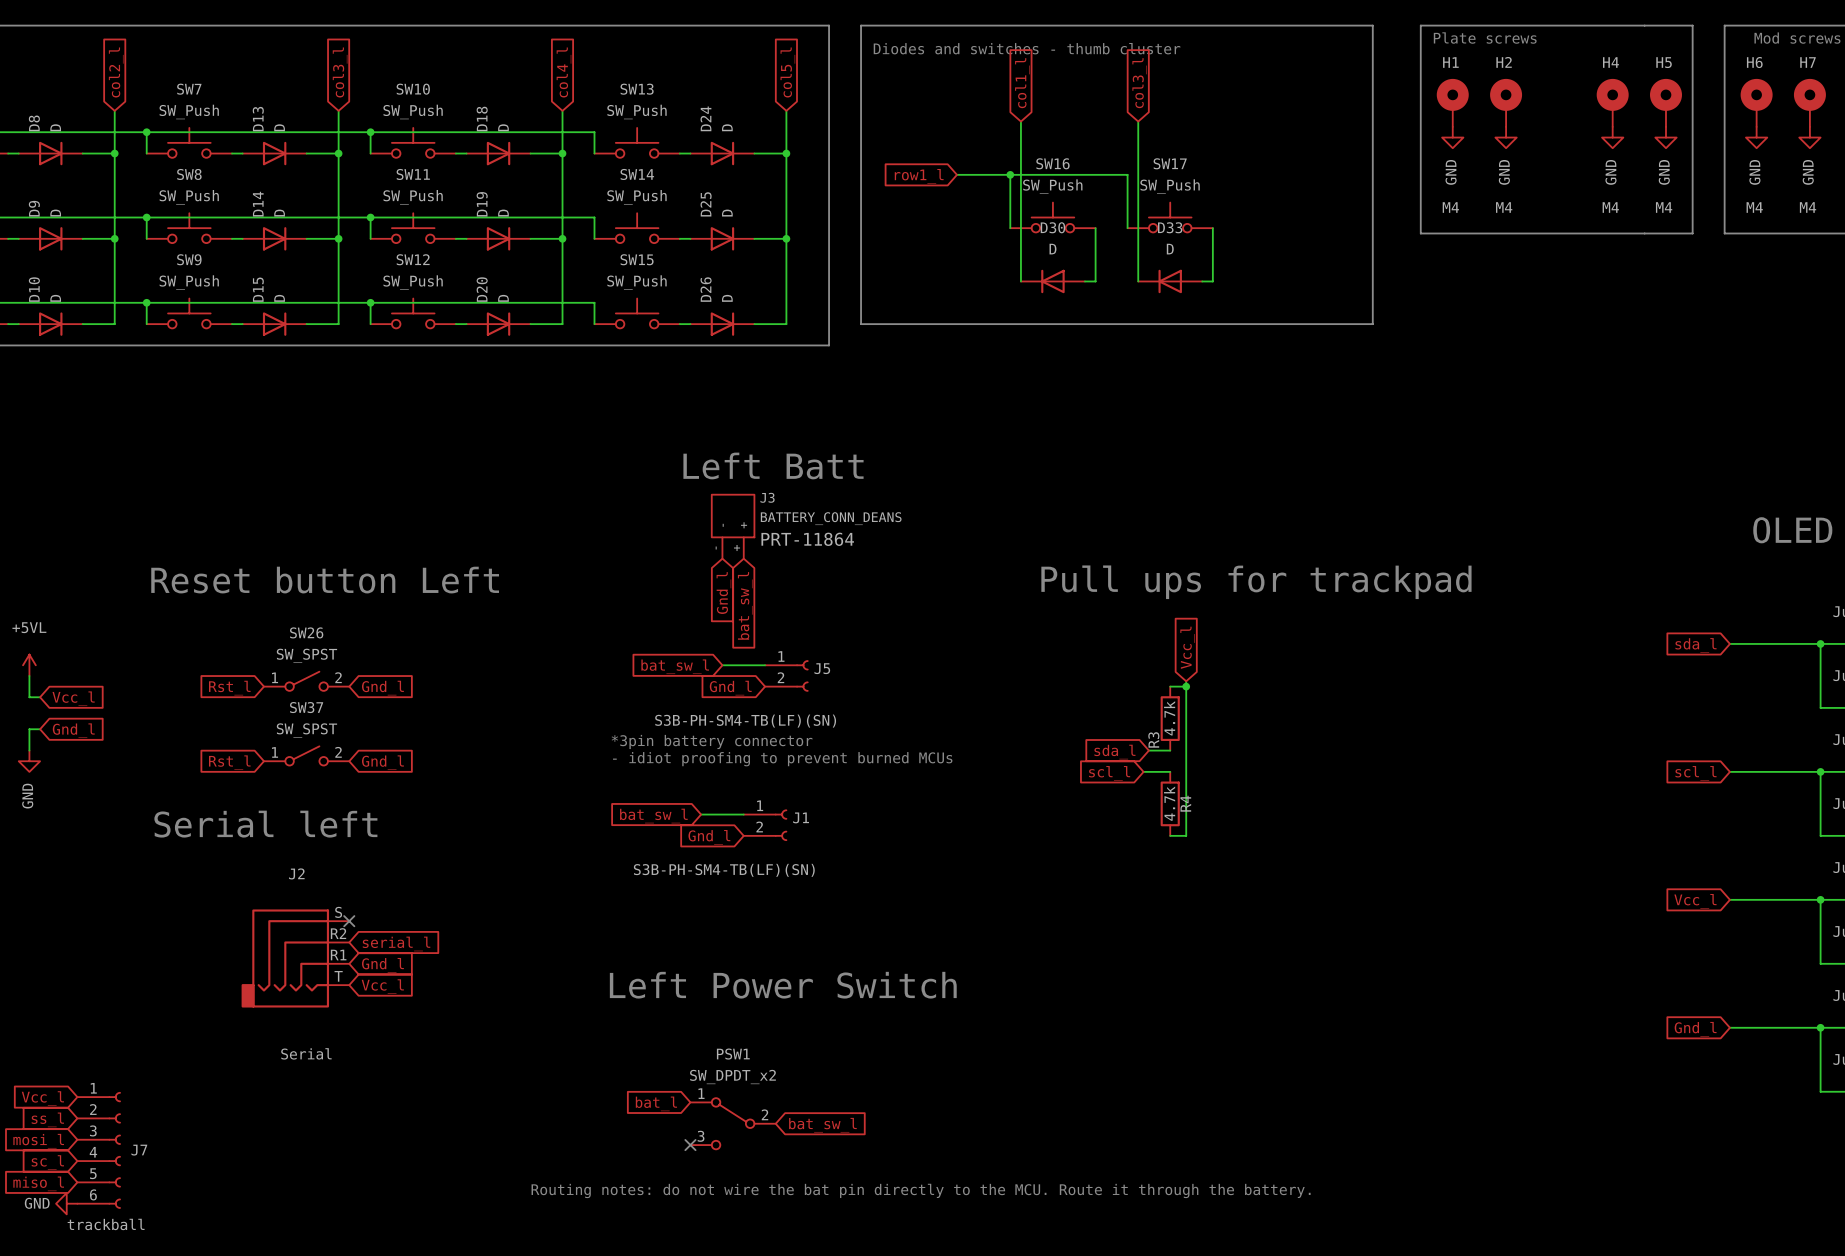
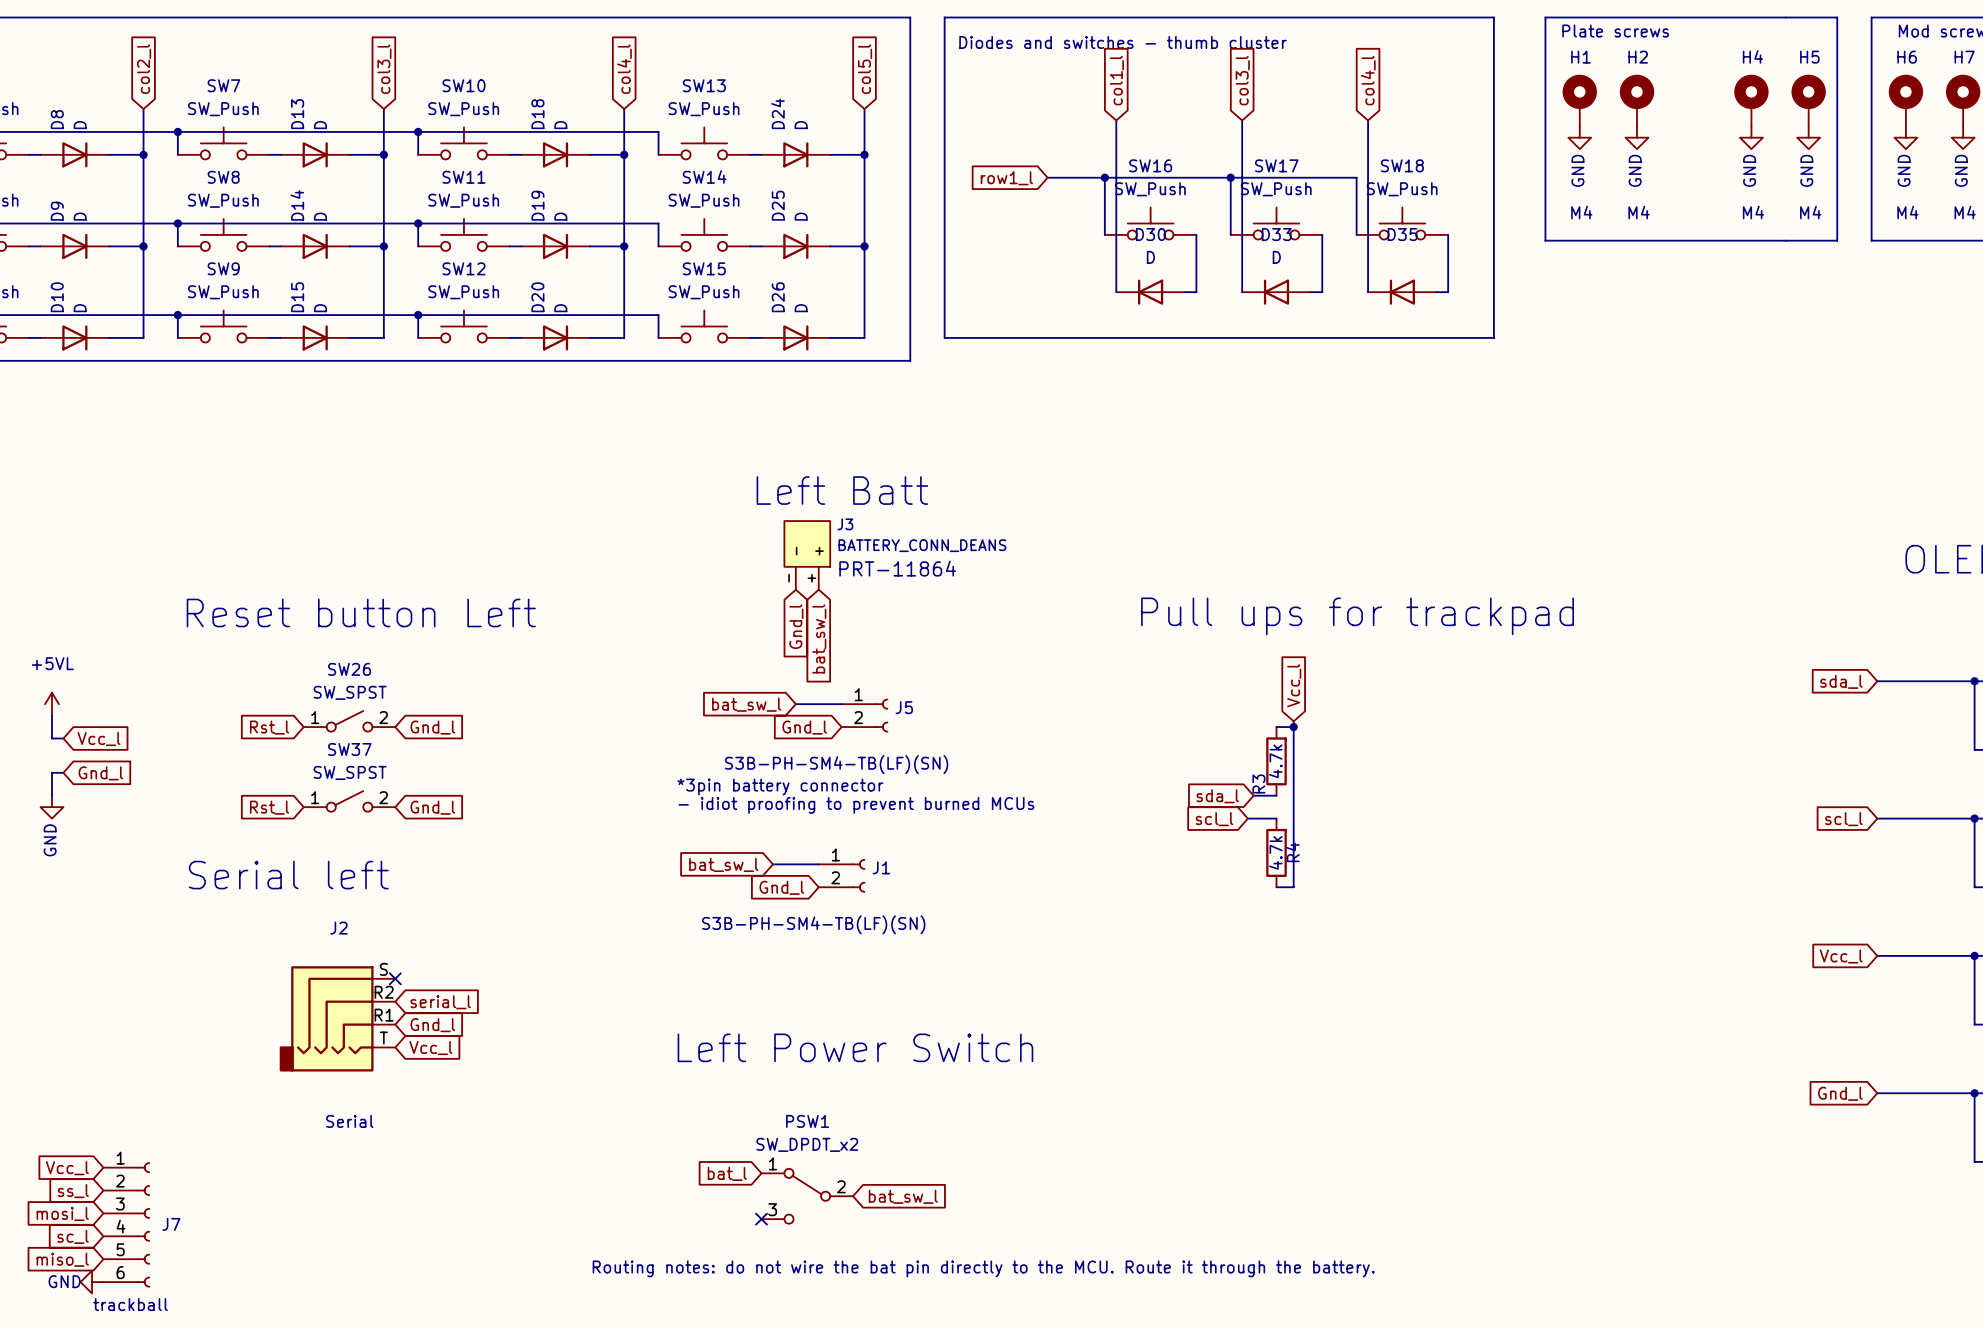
global label: none -> col4_l (1368, 80)
wire: none -> (1368, 120) (1368, 292)
wire: none -> (1230, 177) (1356, 177) (1356, 234)
junction: none -> (1230, 177)
SW18: none -> SW_Push (1402, 223)
wire: none -> (1448, 234) (1448, 292) (1436, 292)
D35: none -> (1402, 292)

